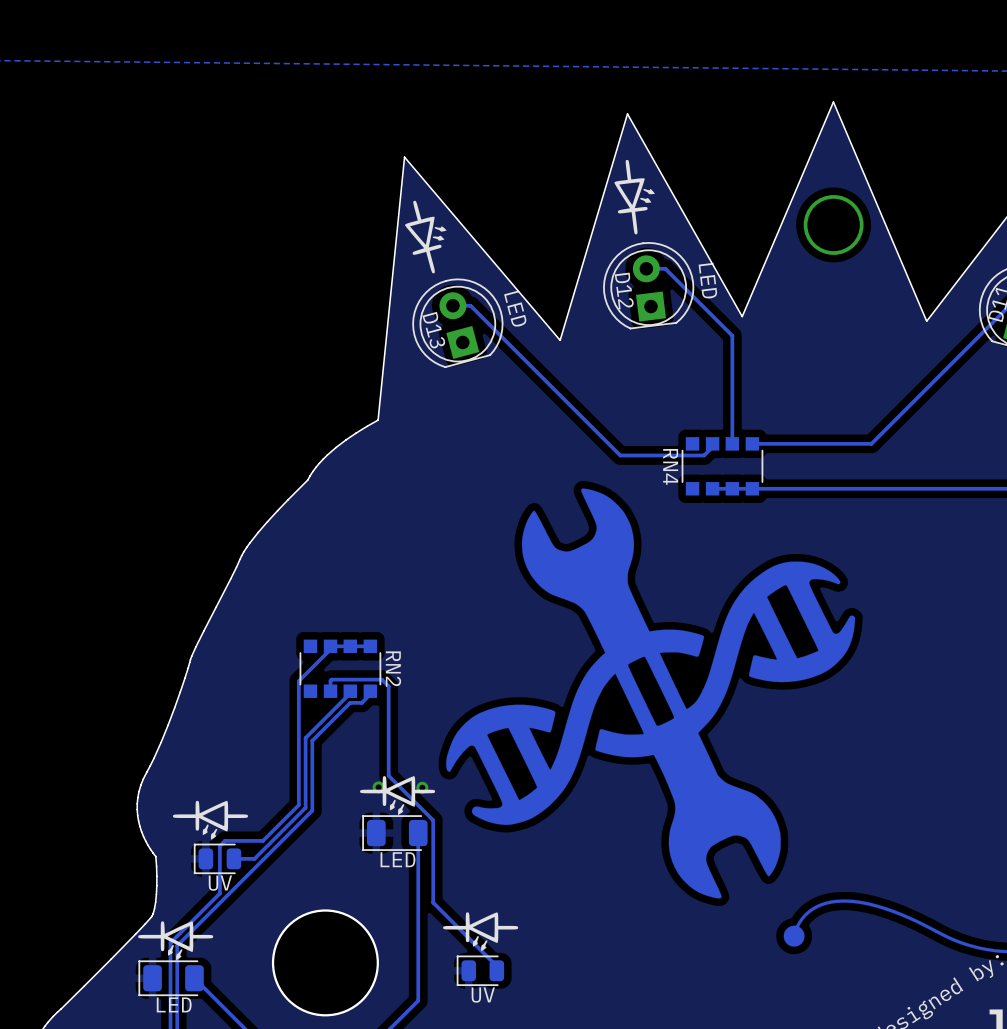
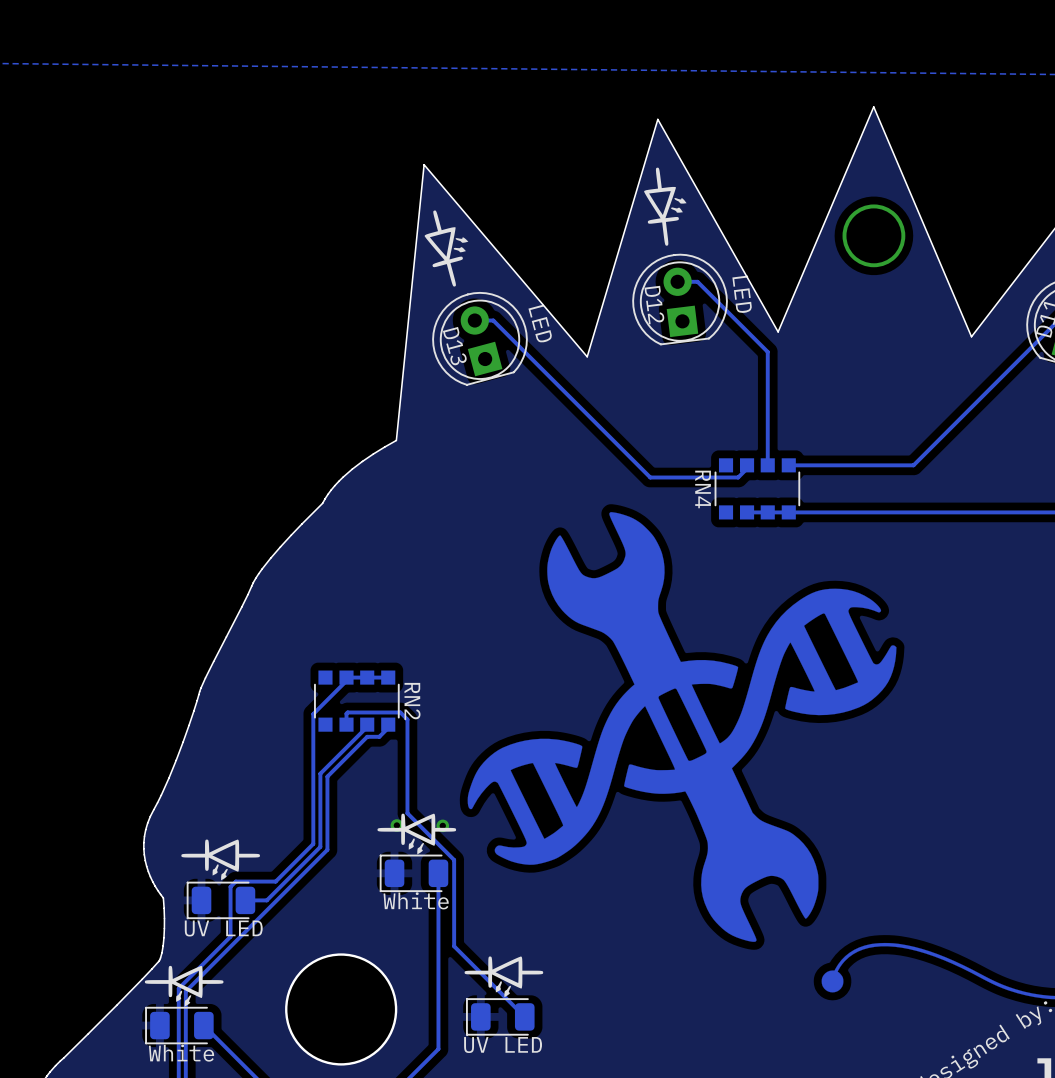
part footprint: [193, 843, 242, 875] -> [186, 881, 256, 920]
part value: LED (397, 859) -> White (416, 900)
part value: UV (220, 883) -> UV LED (223, 928)
part footprint: [456, 955, 505, 987] -> [466, 998, 535, 1036]
part value: UV (483, 995) -> UV LED (503, 1045)
part value: LED (174, 1004) -> White (181, 1053)

